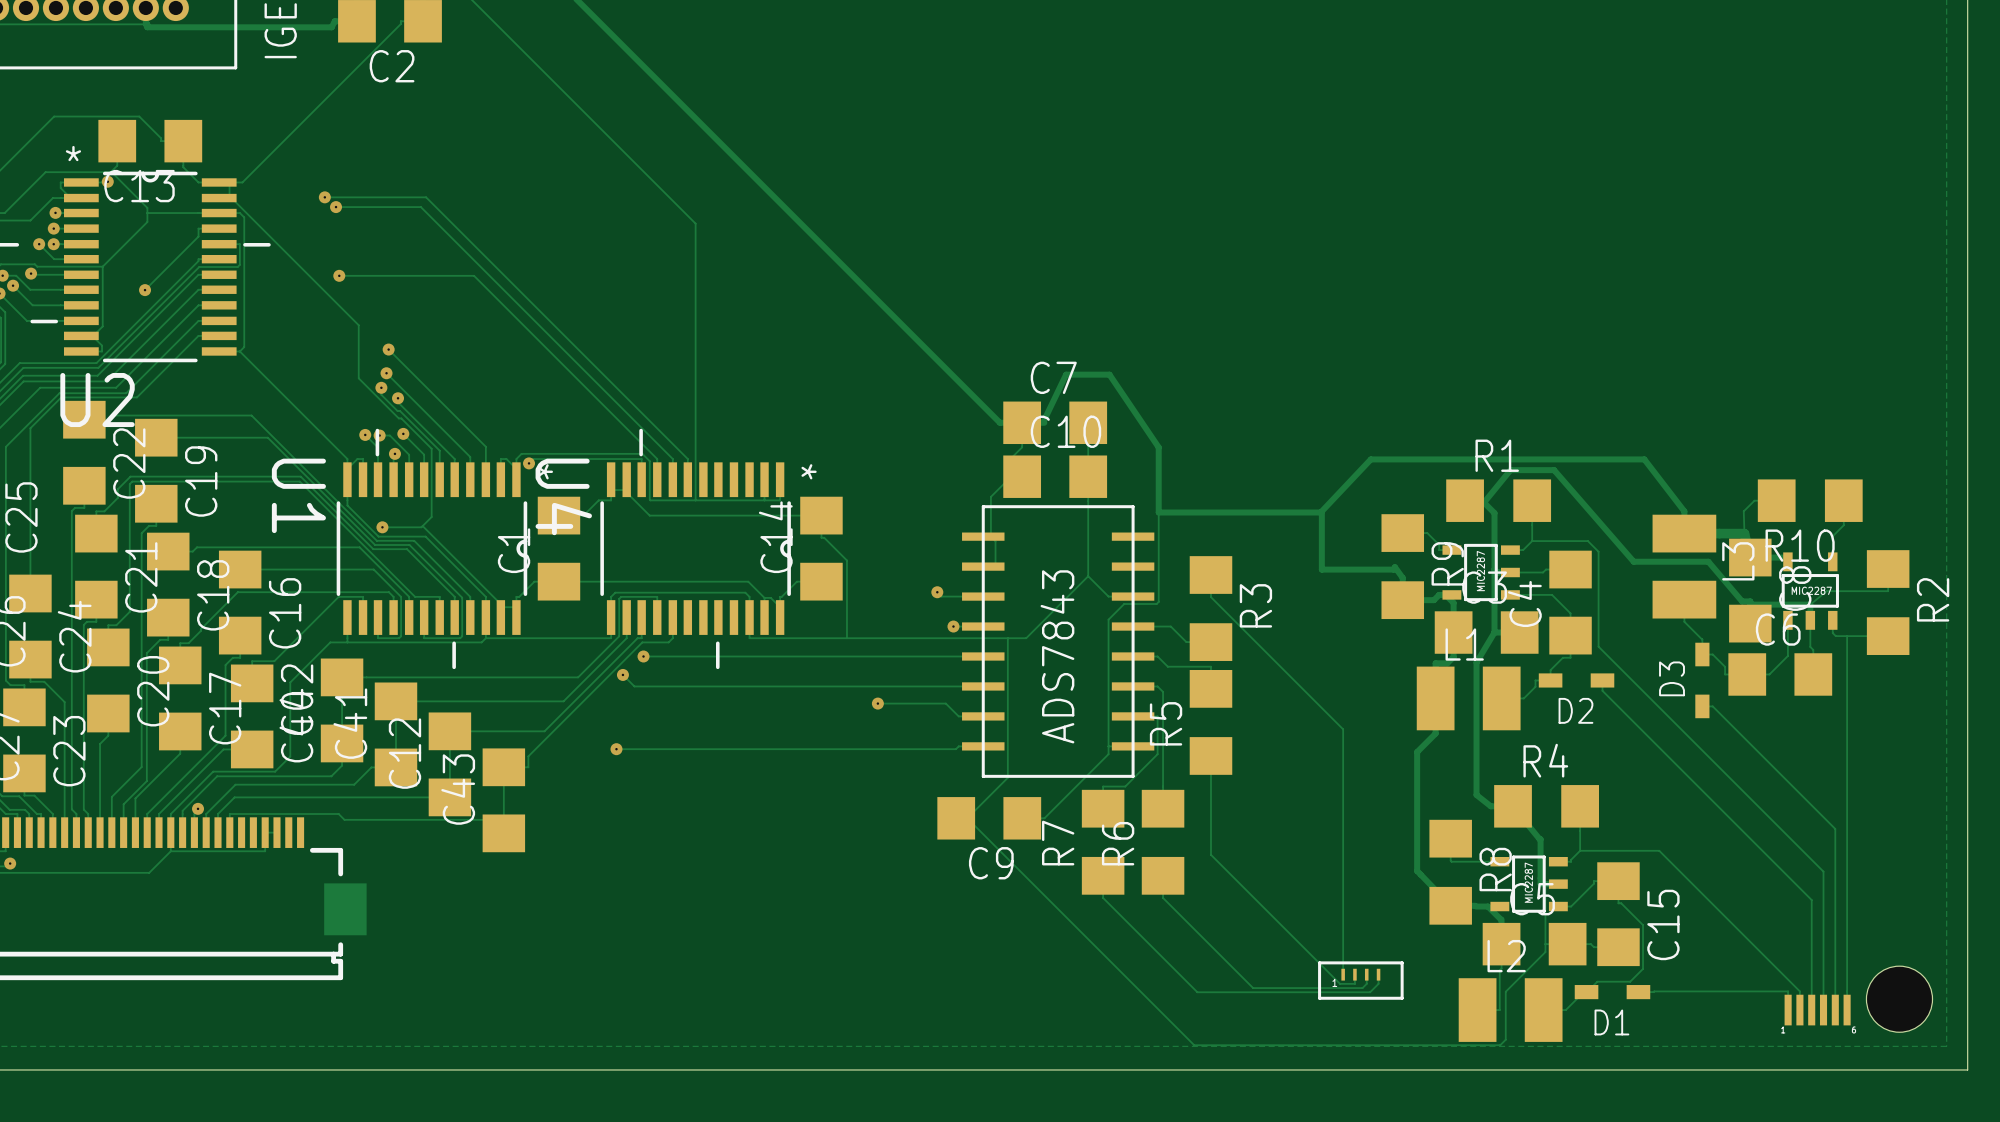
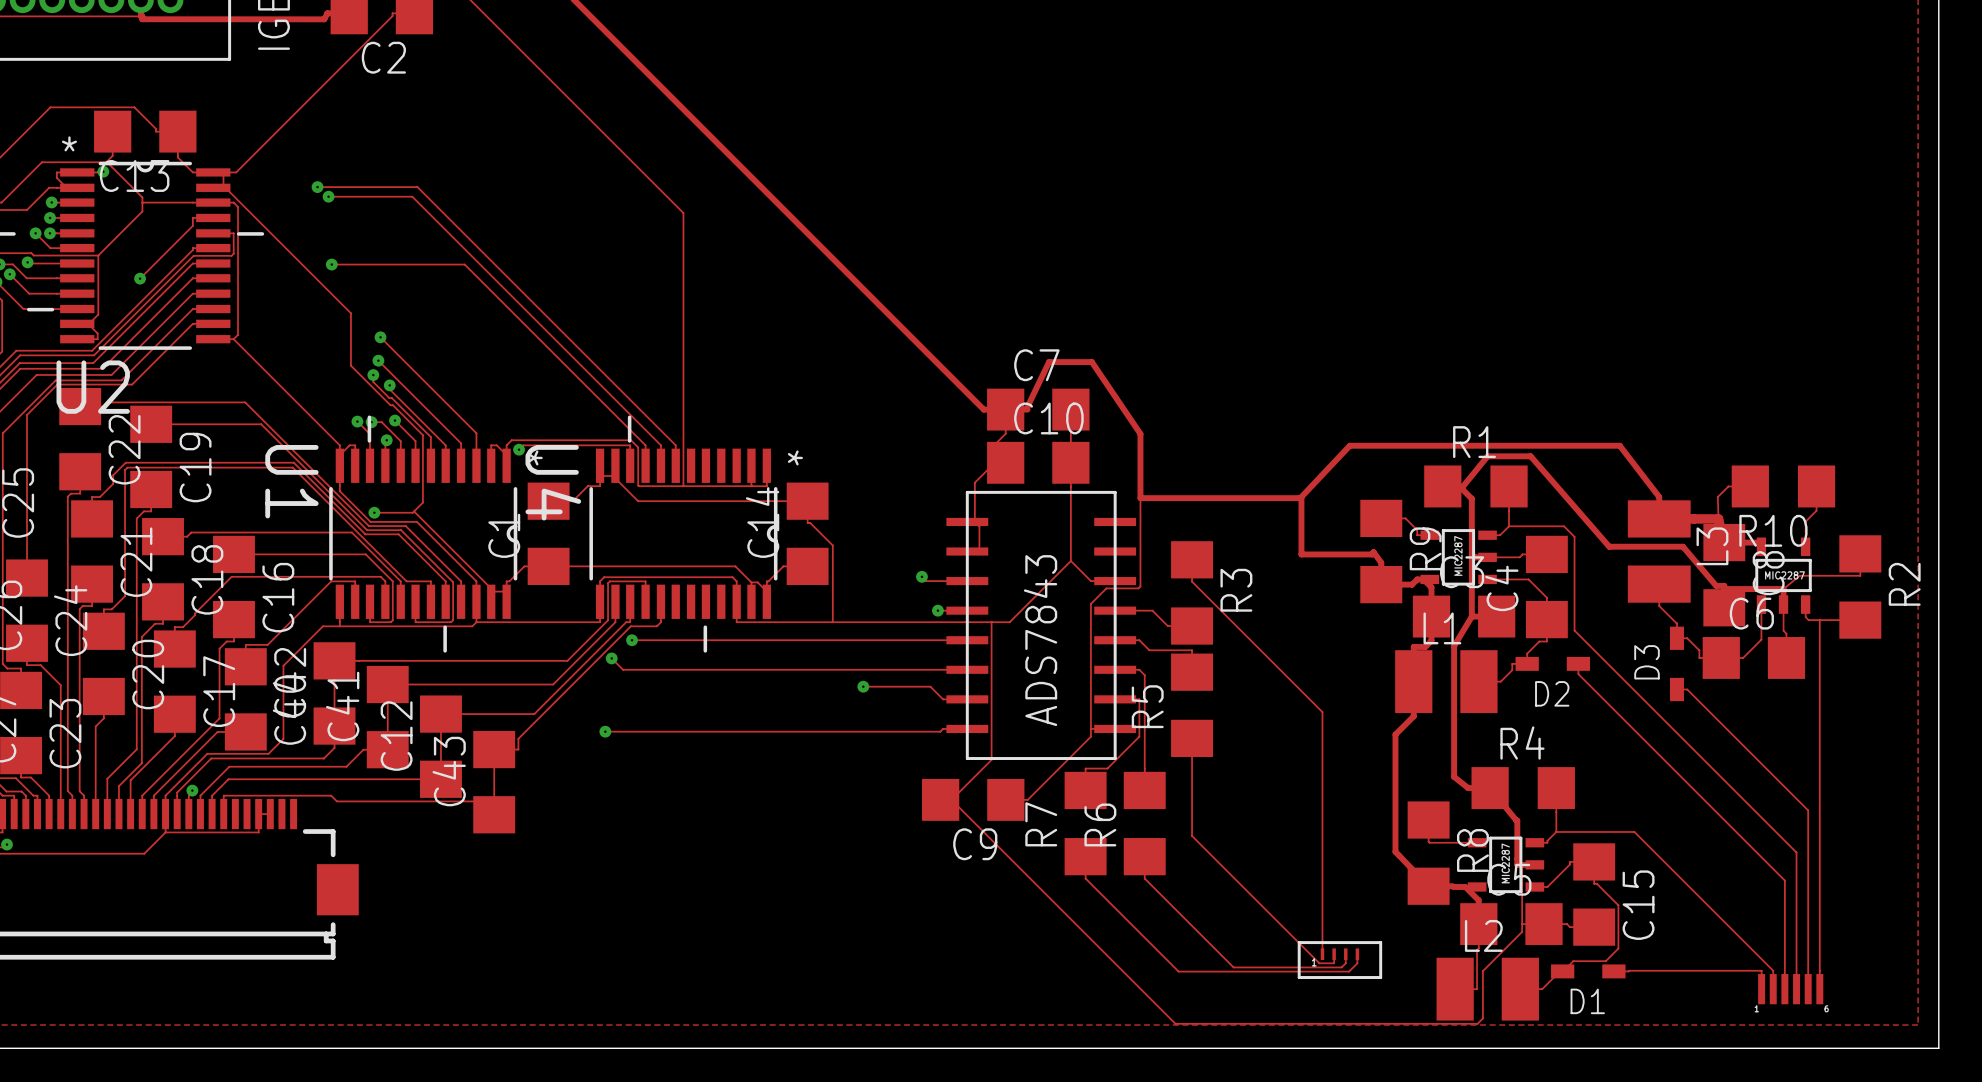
hole: (1899, 999) -> none

